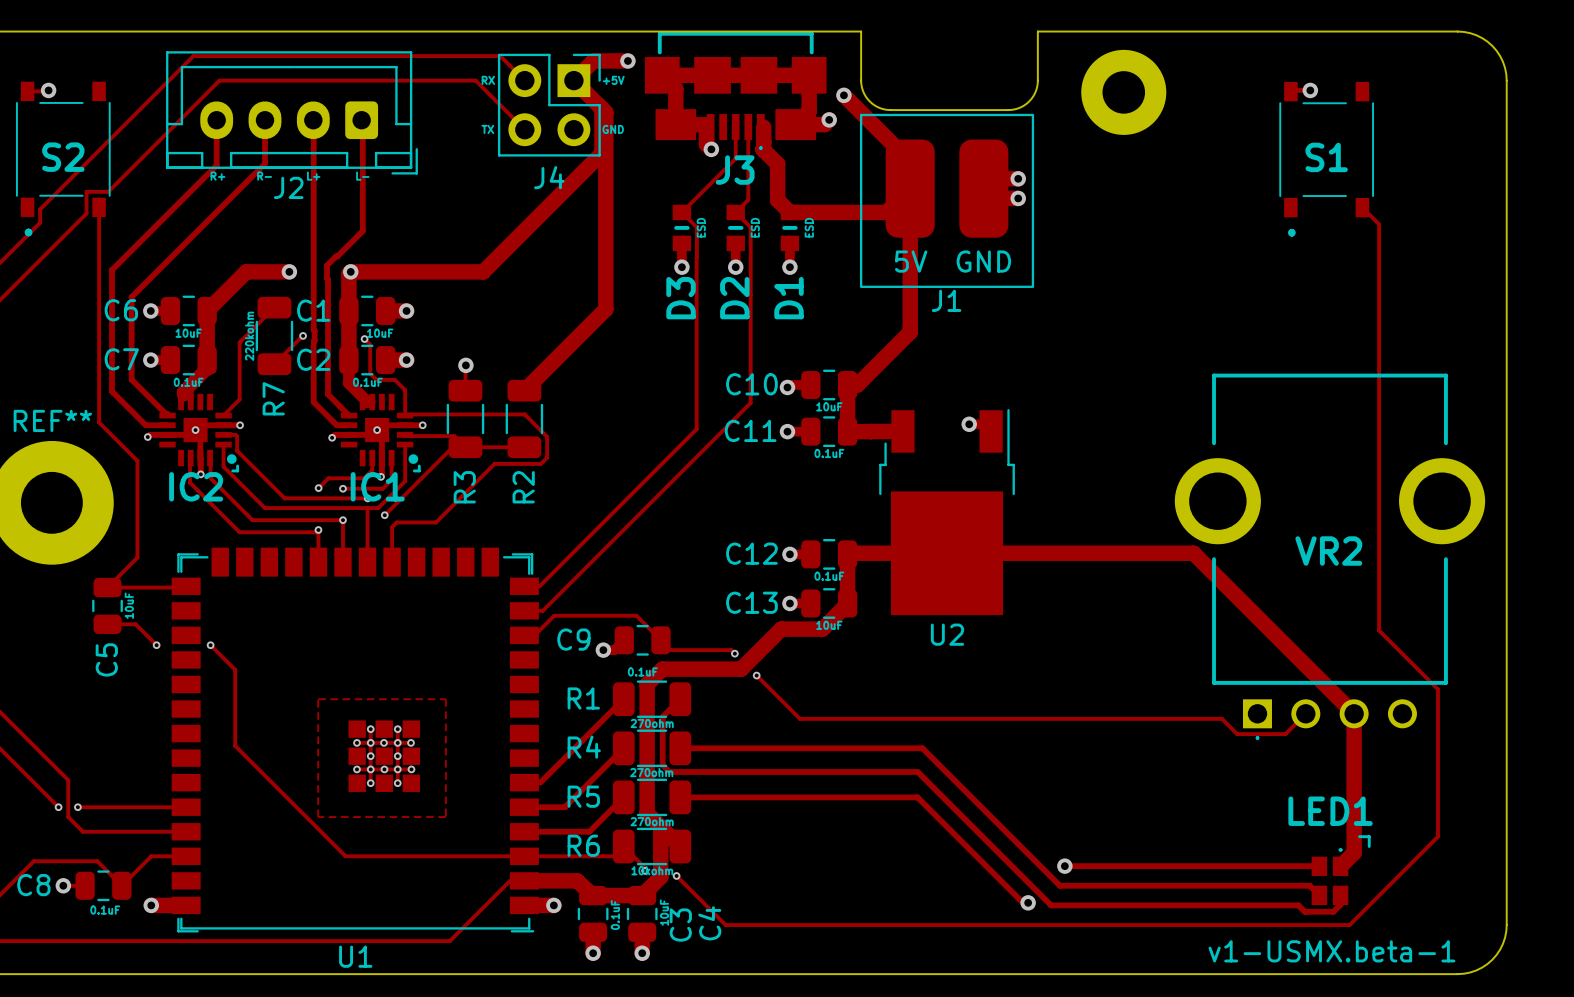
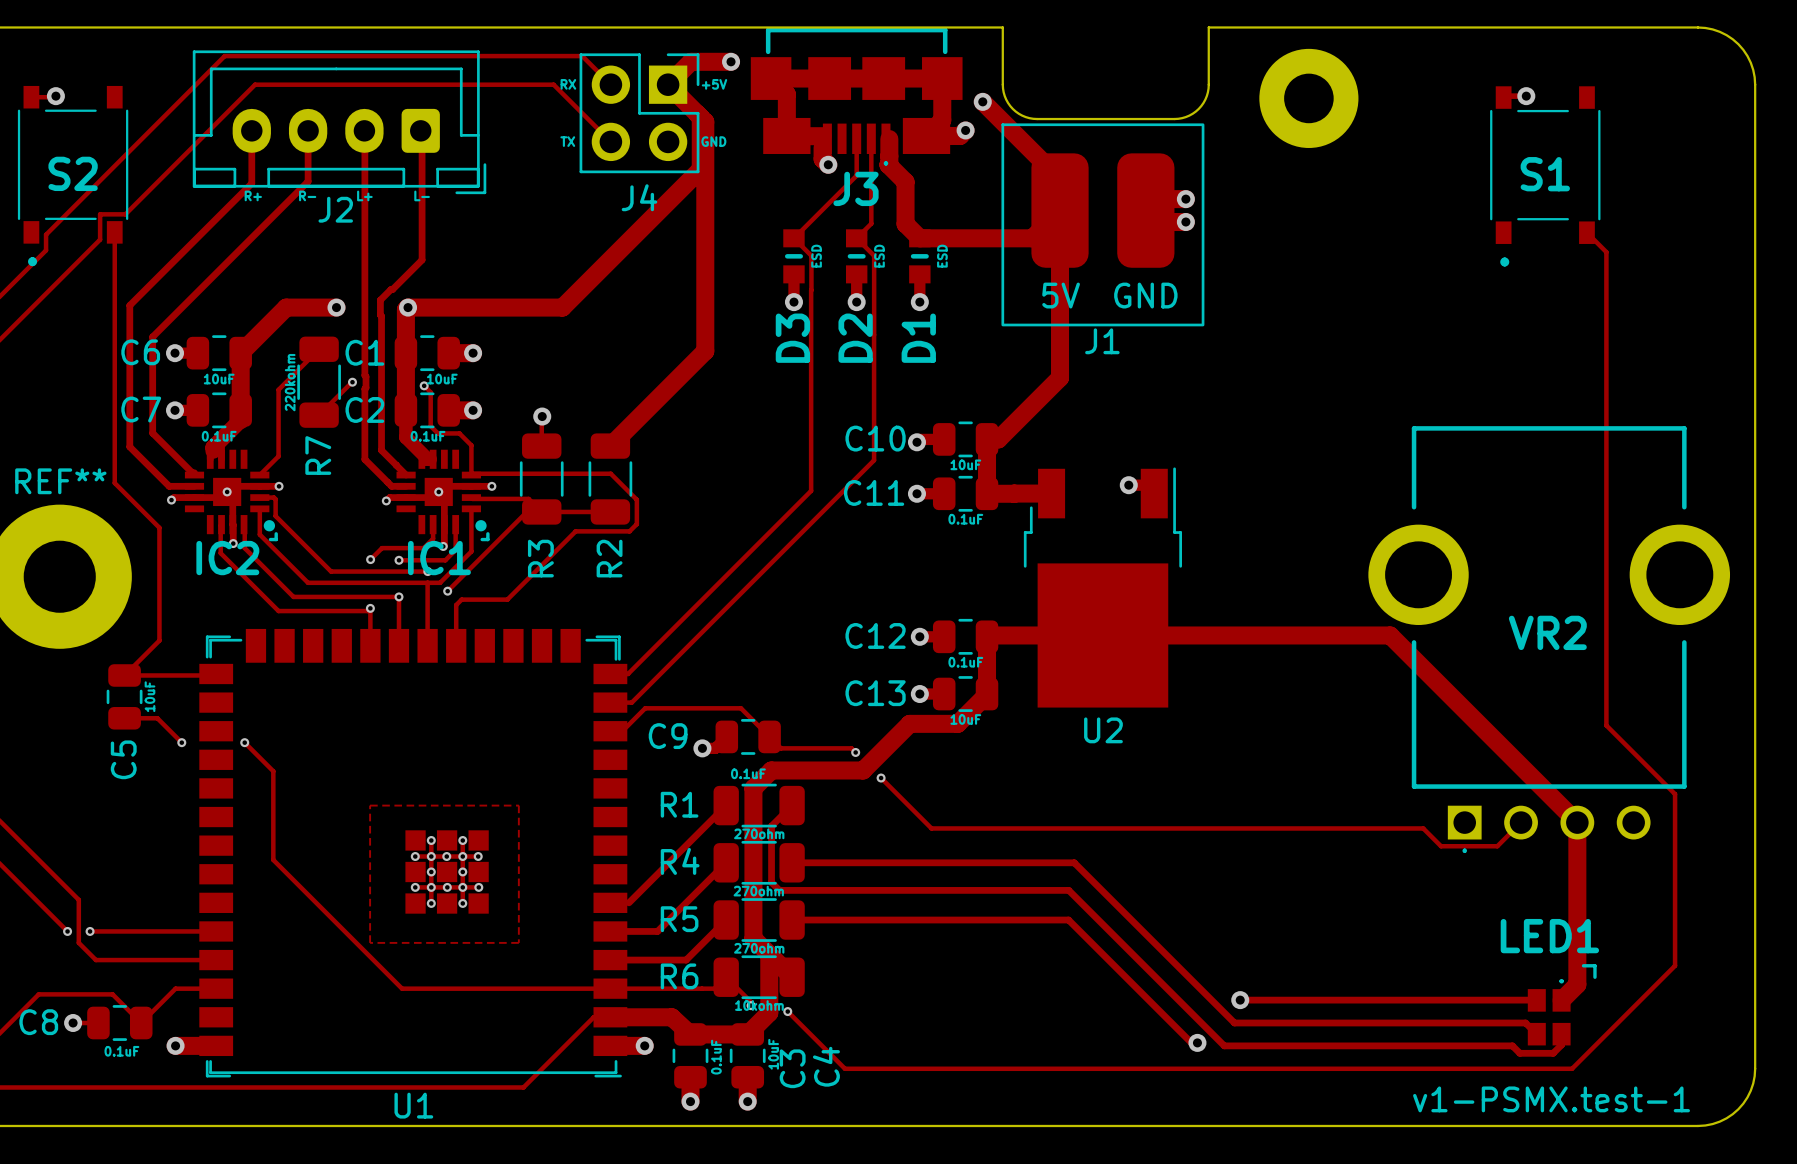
text: v1-USMX.beta-1 (1331, 951) -> v1-PSMX.test-1 (1551, 1099)

